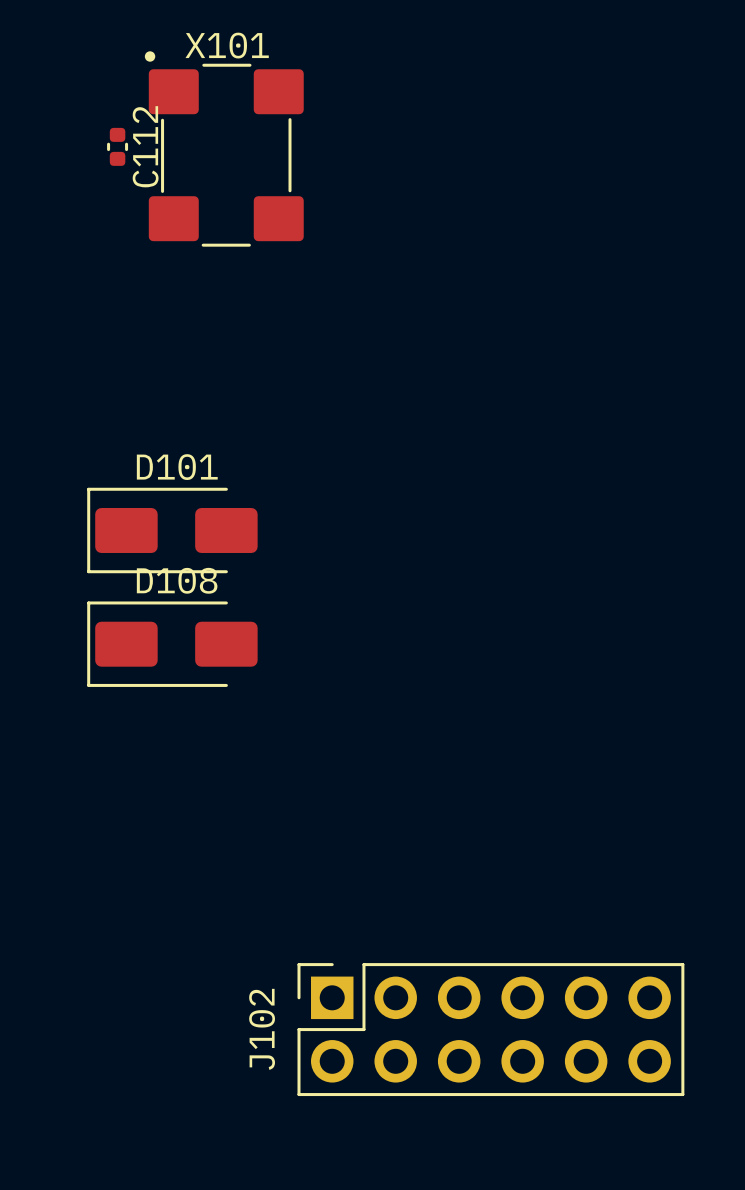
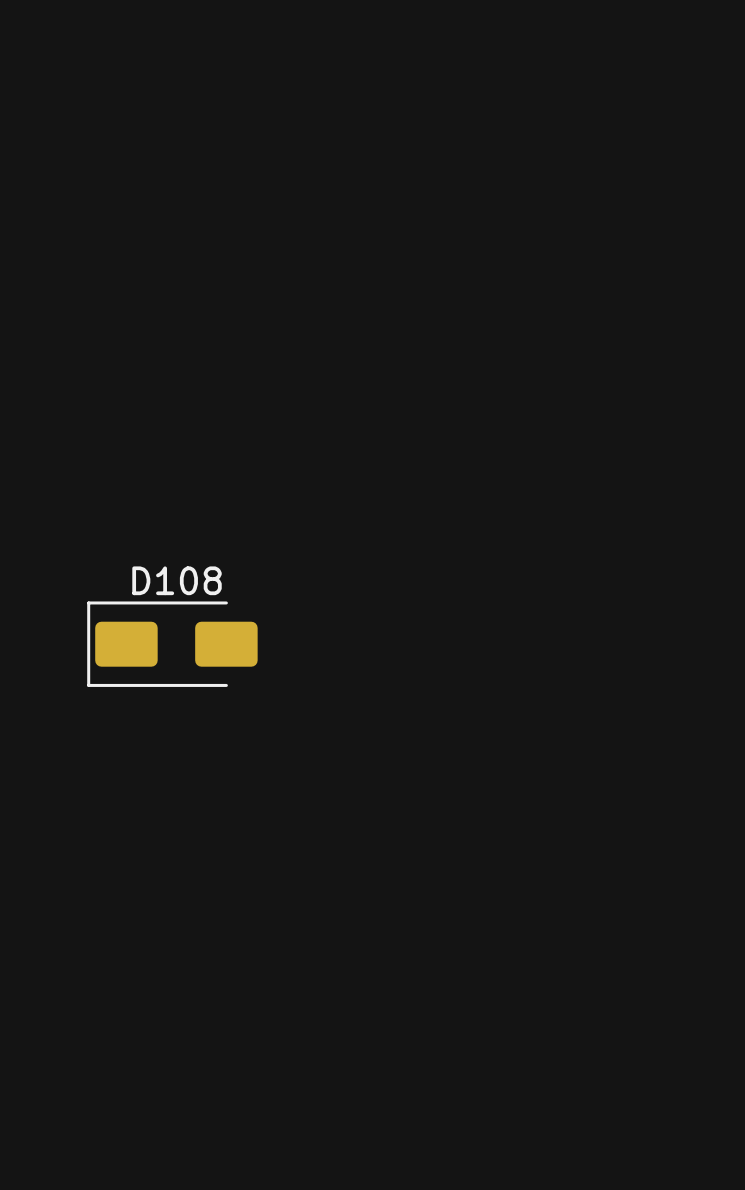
C112: (117, 146) -> none
X101: (224, 148) -> none
D101: (172, 530) -> none
J102: (490, 1029) -> none

